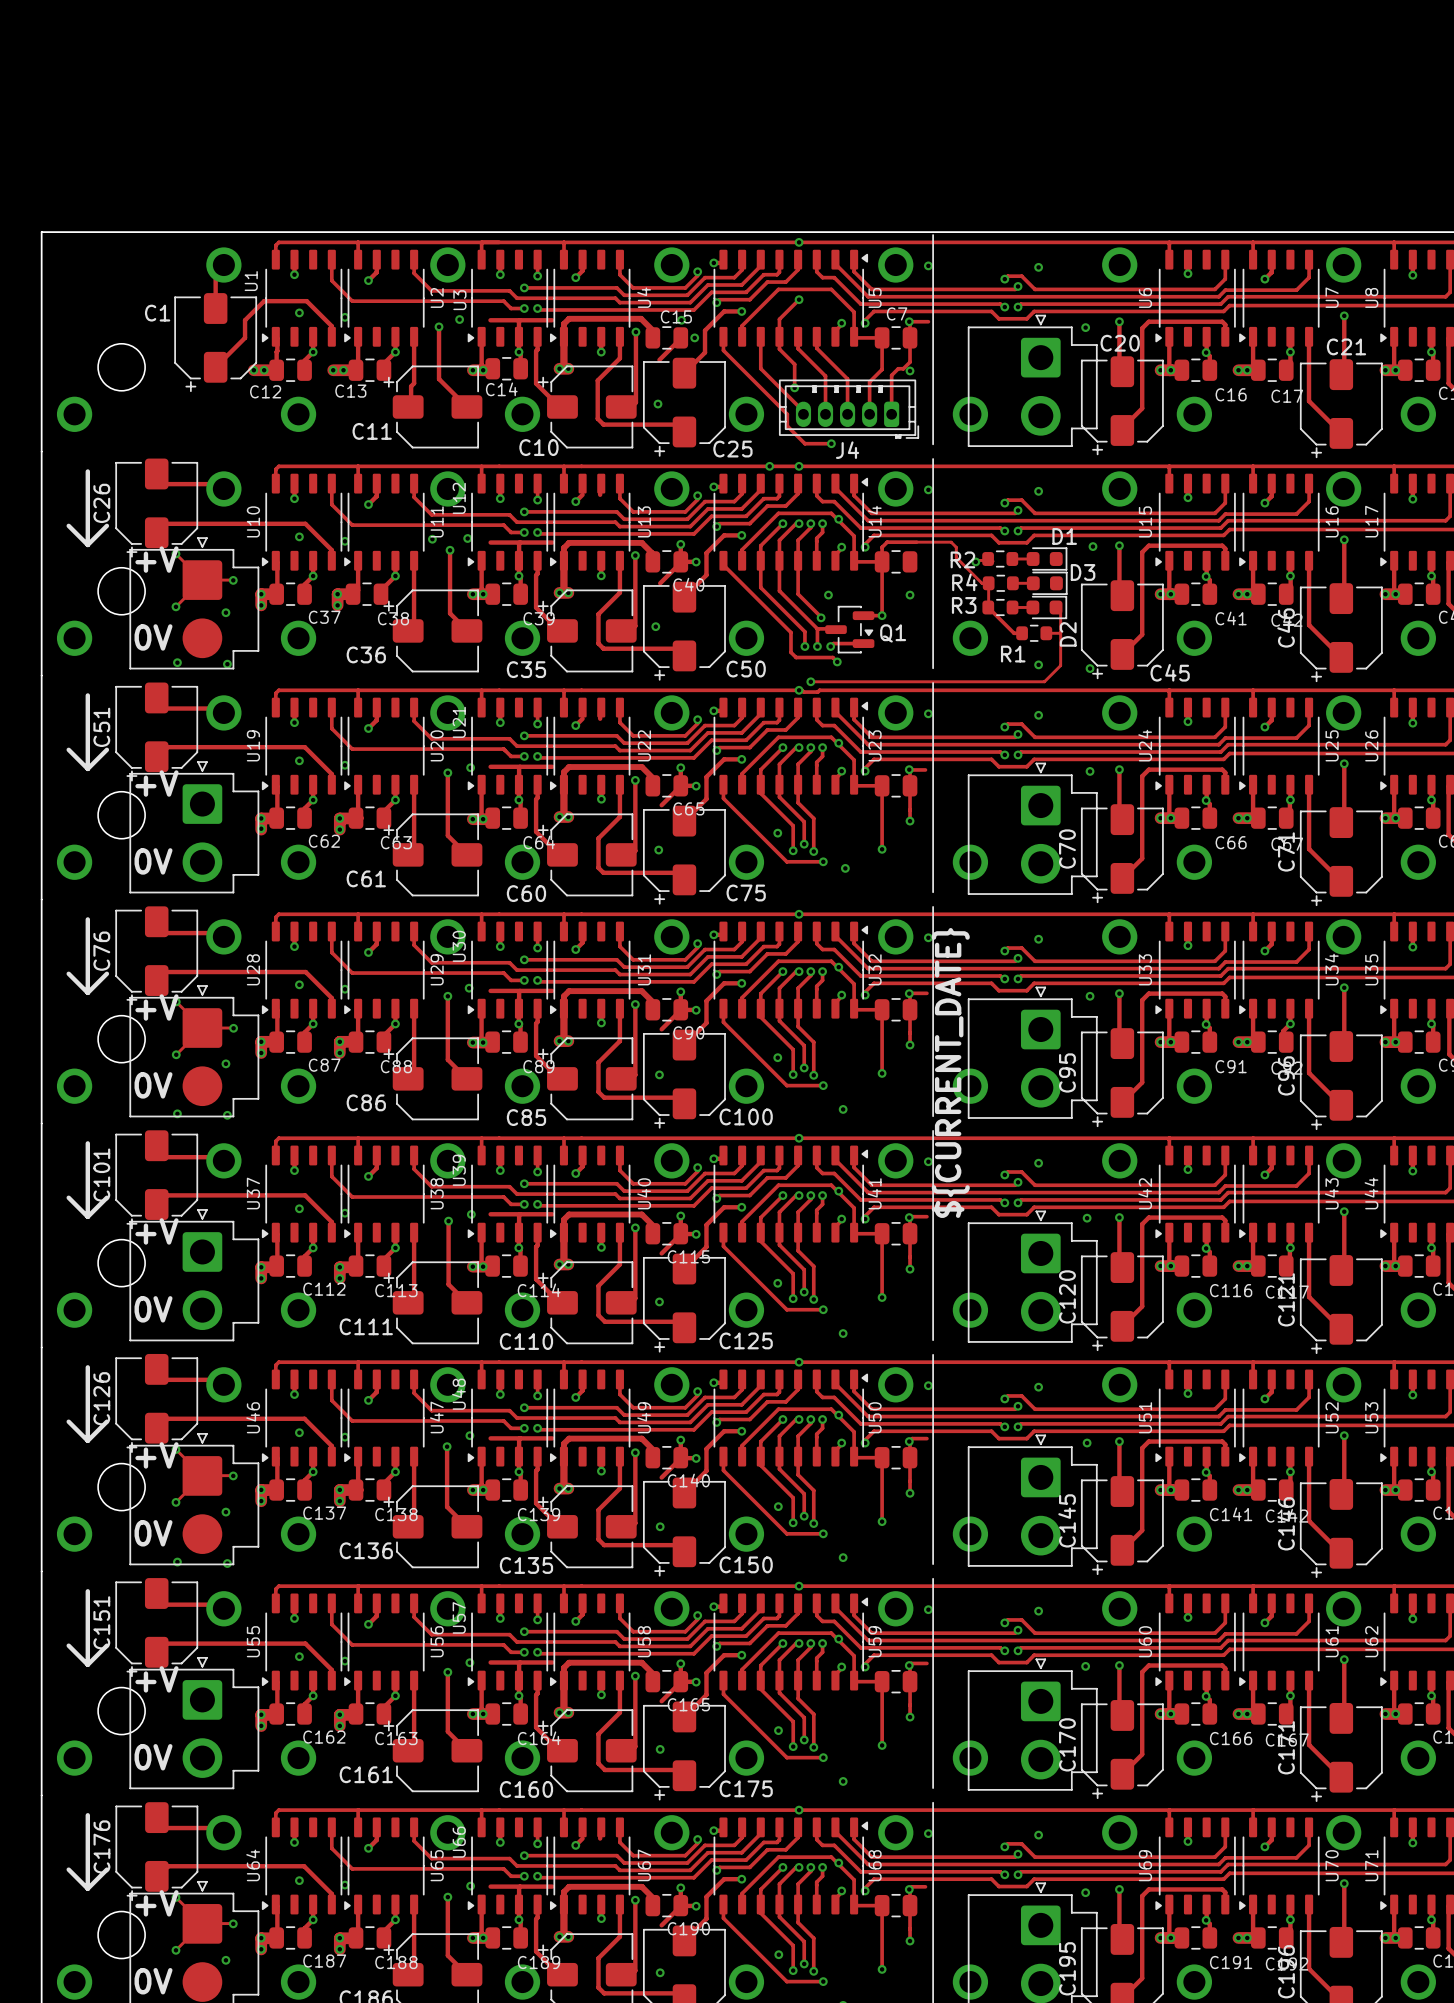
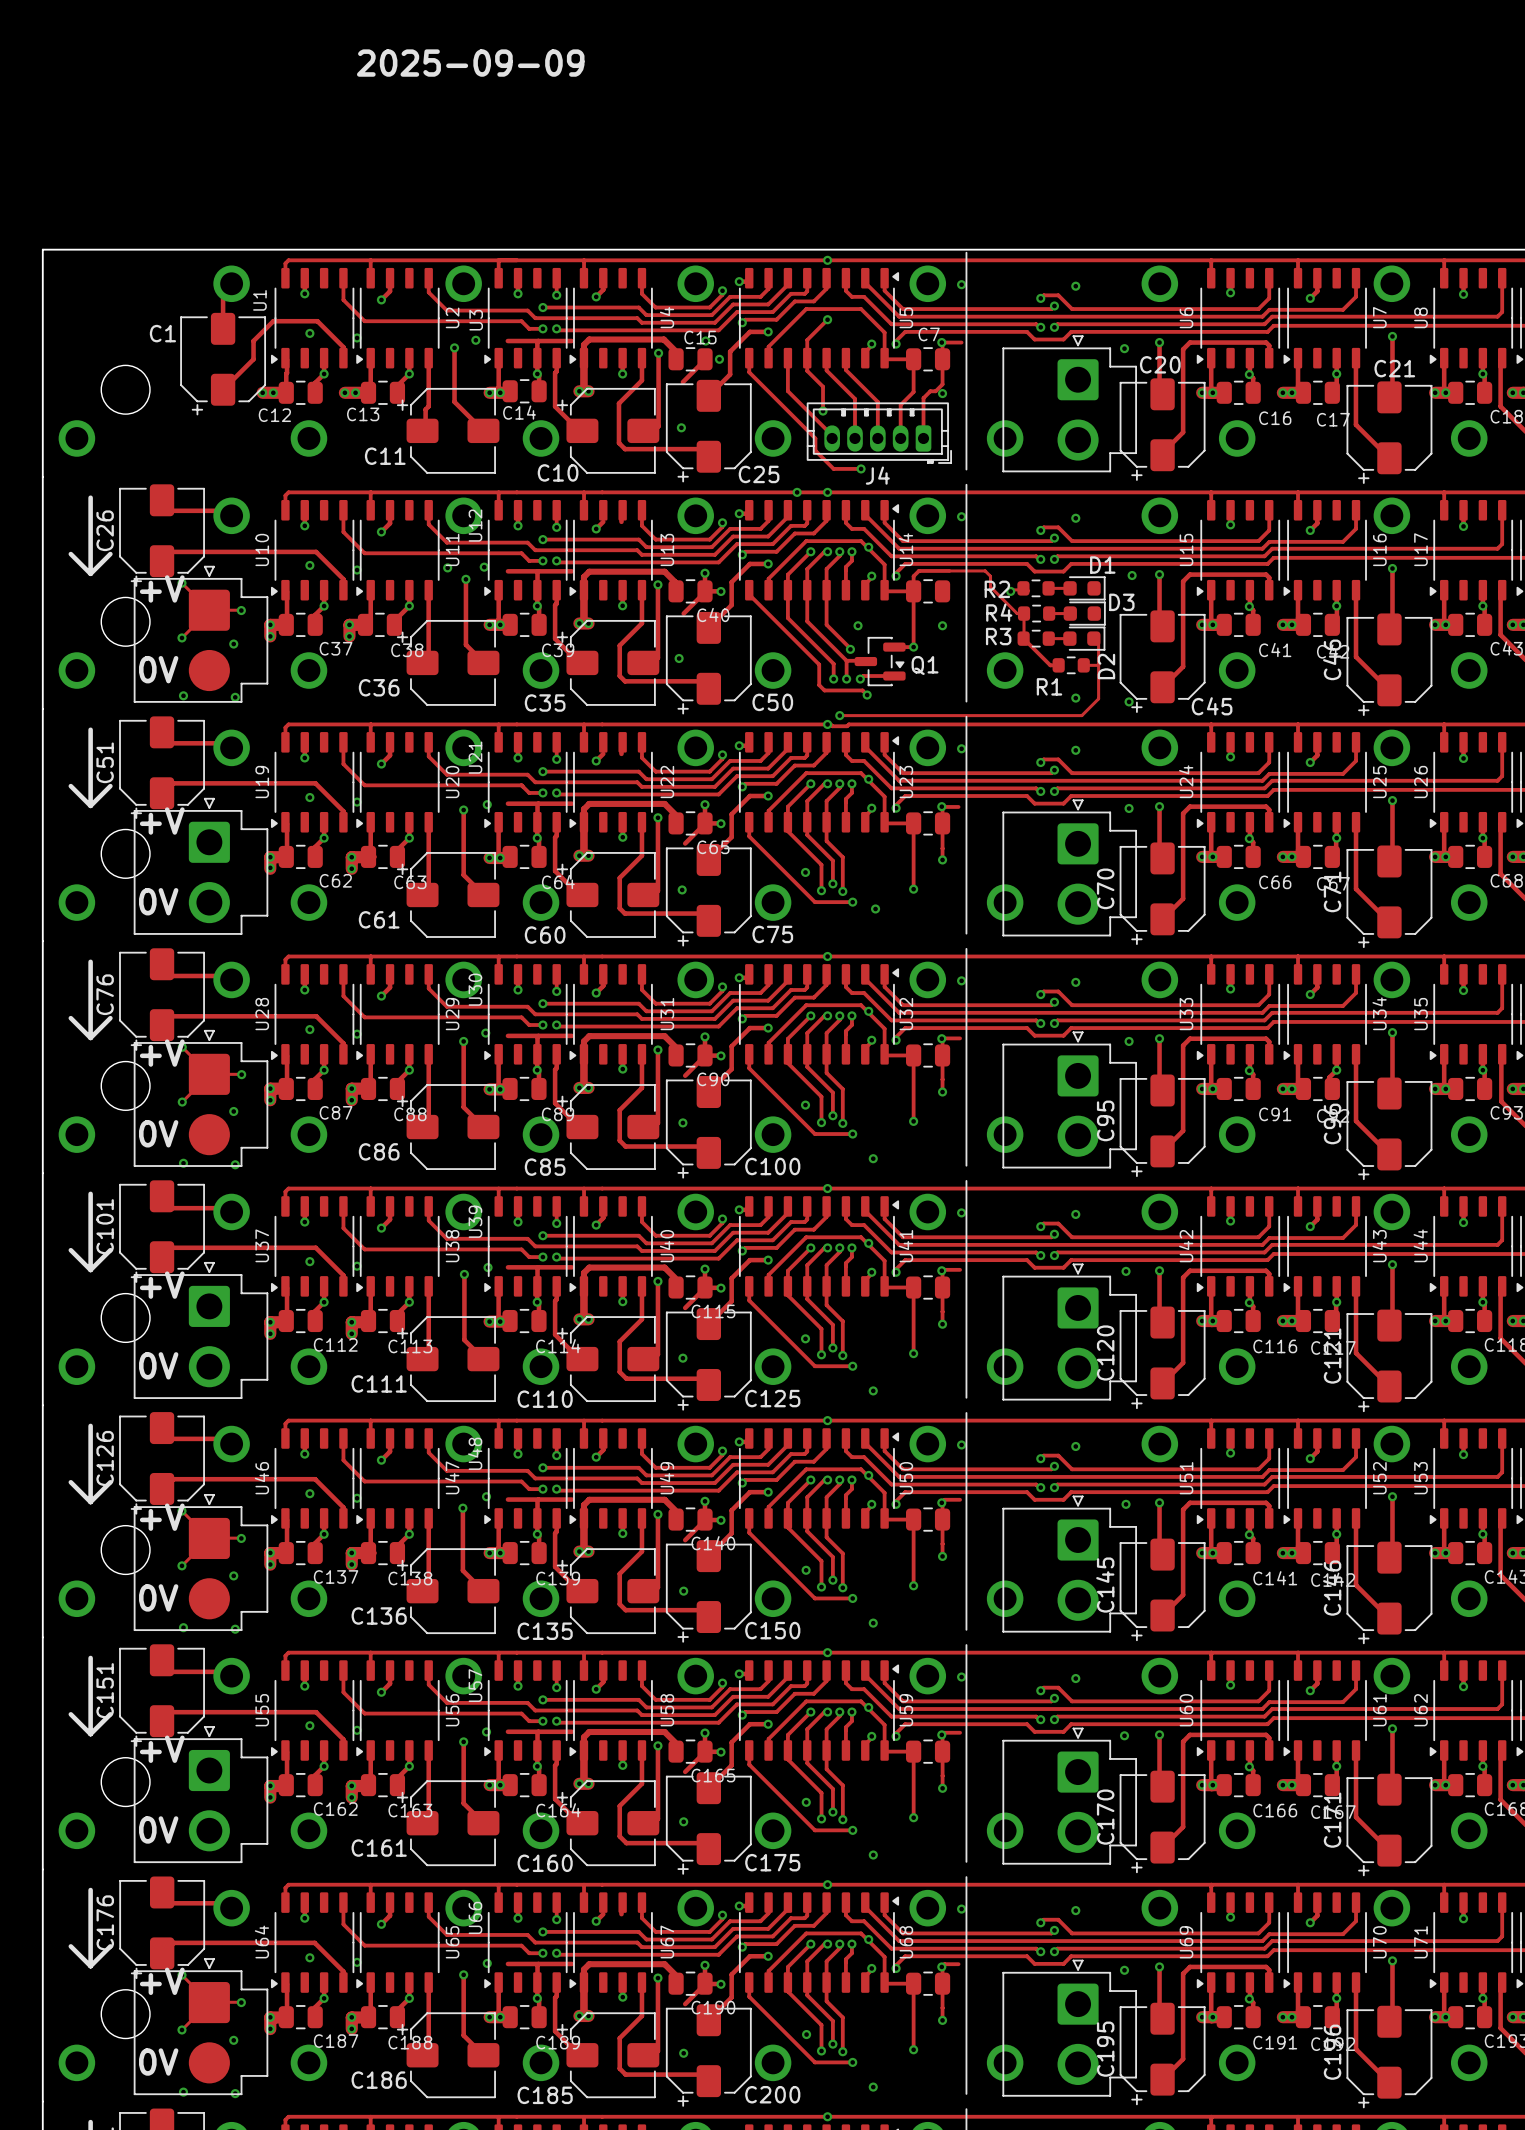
text: none -> 2025-09-09 (470, 63)
text: ${CURRENT_DATE} (950, 1072) -> none

